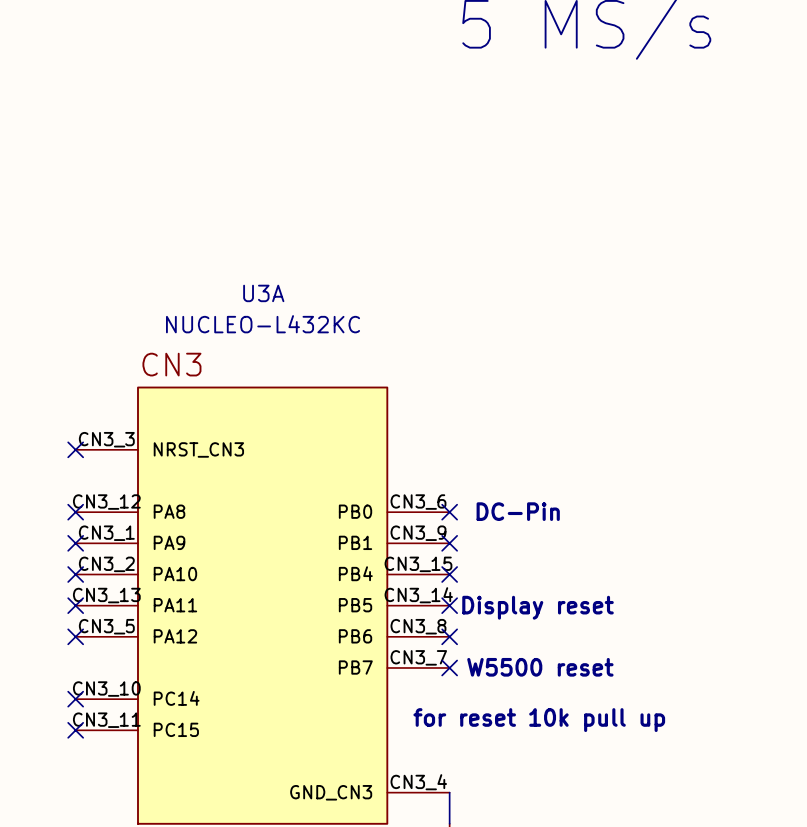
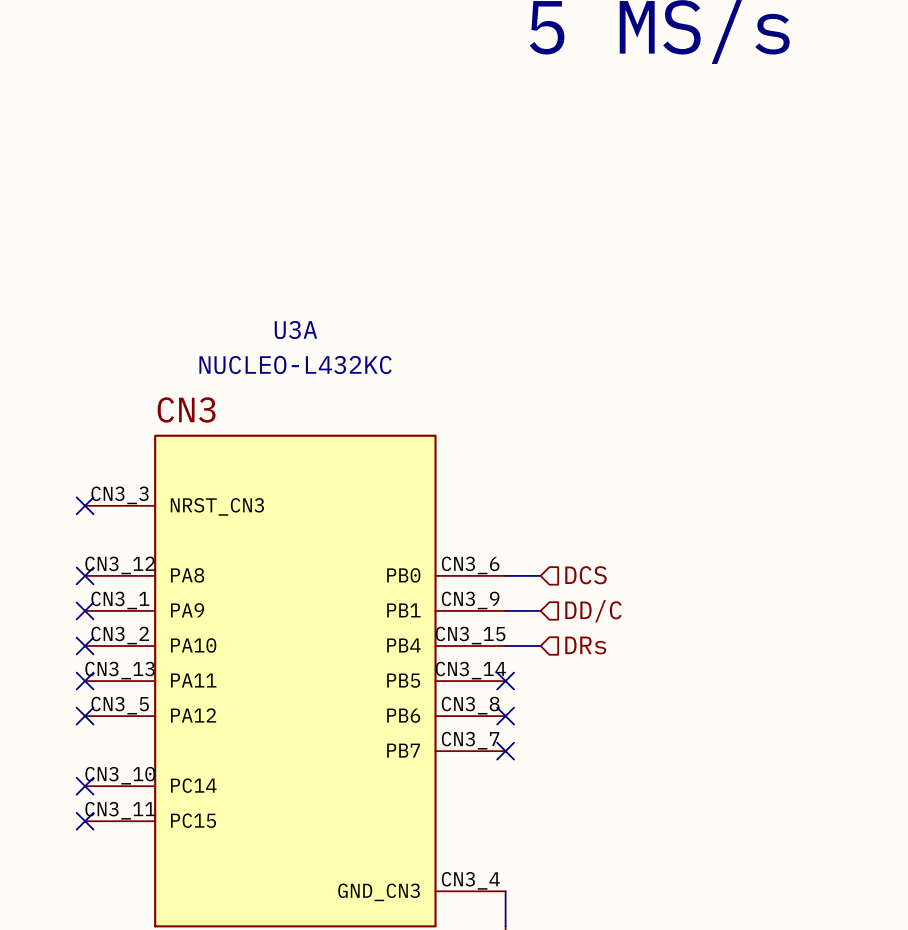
text: DC-Pin (518, 511) -> none
hierarchical label: none -> DCS (585, 575)
wire: none -> (505, 575) (540, 575)
no-connect mark: (449, 512) -> none
wire: none -> (505, 610) (540, 610)
no-connect mark: (449, 543) -> none
hierarchical label: none -> DD/C (593, 611)
hierarchical label: none -> DRs (585, 645)
wire: none -> (505, 646) (540, 646)
no-connect mark: (449, 574) -> none
text: Display reset (538, 607) -> none
text: W5500 reset (540, 667) -> none
text: for reset 10k pull up (539, 720) -> none

